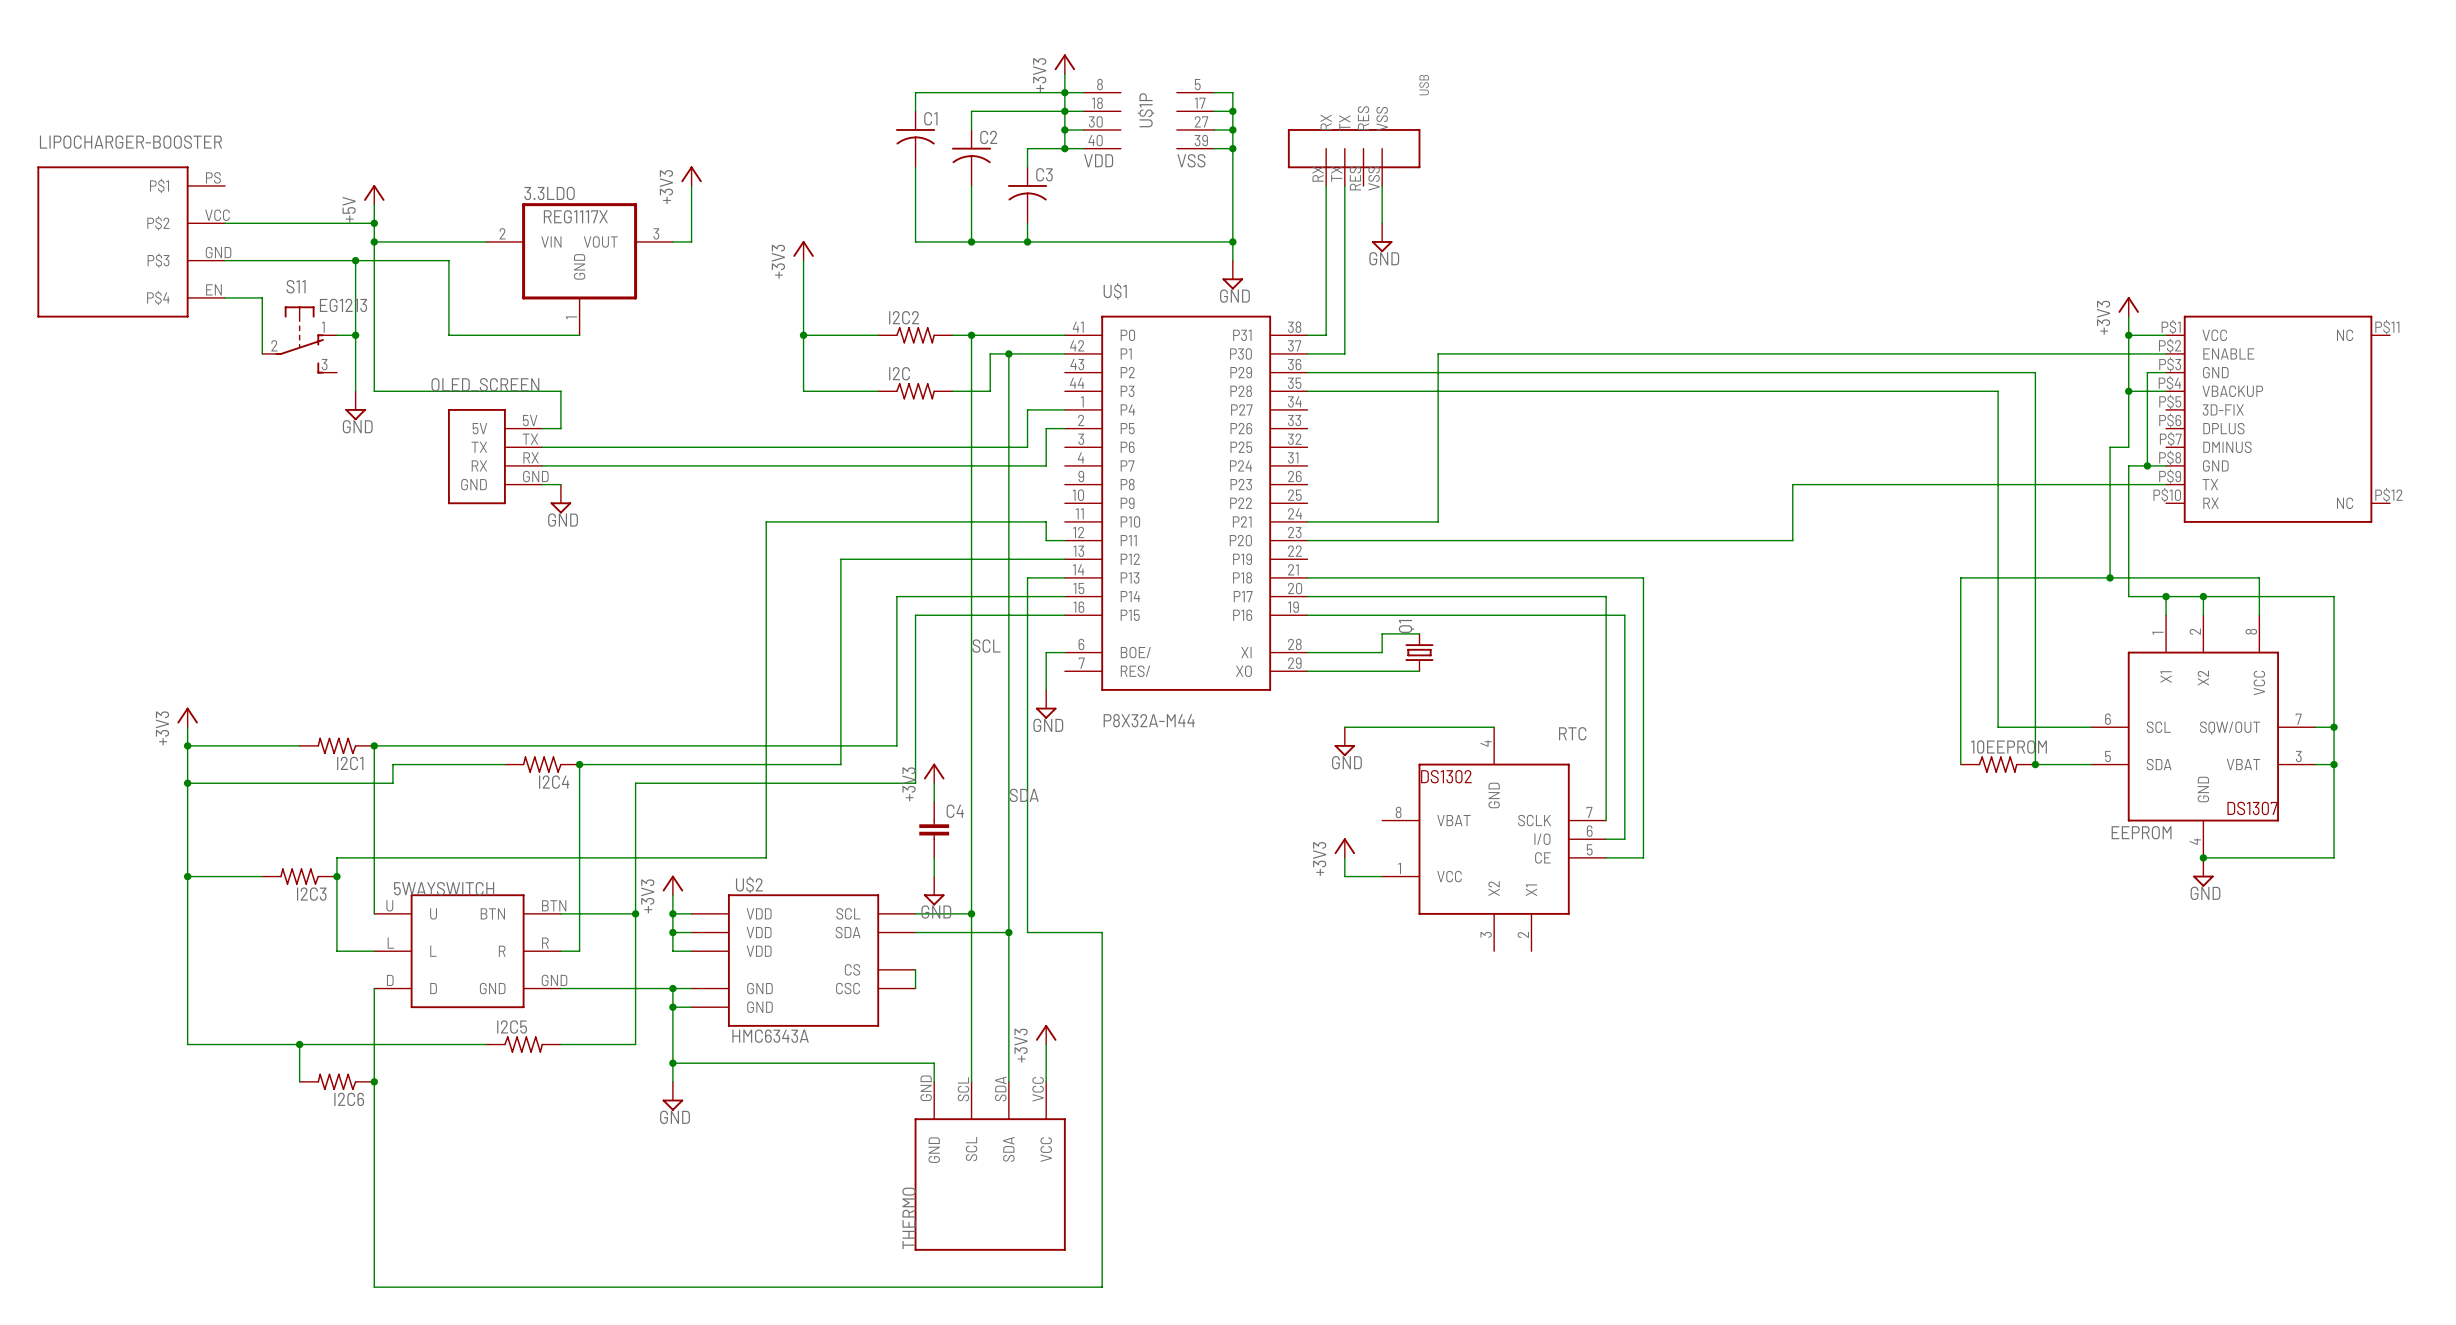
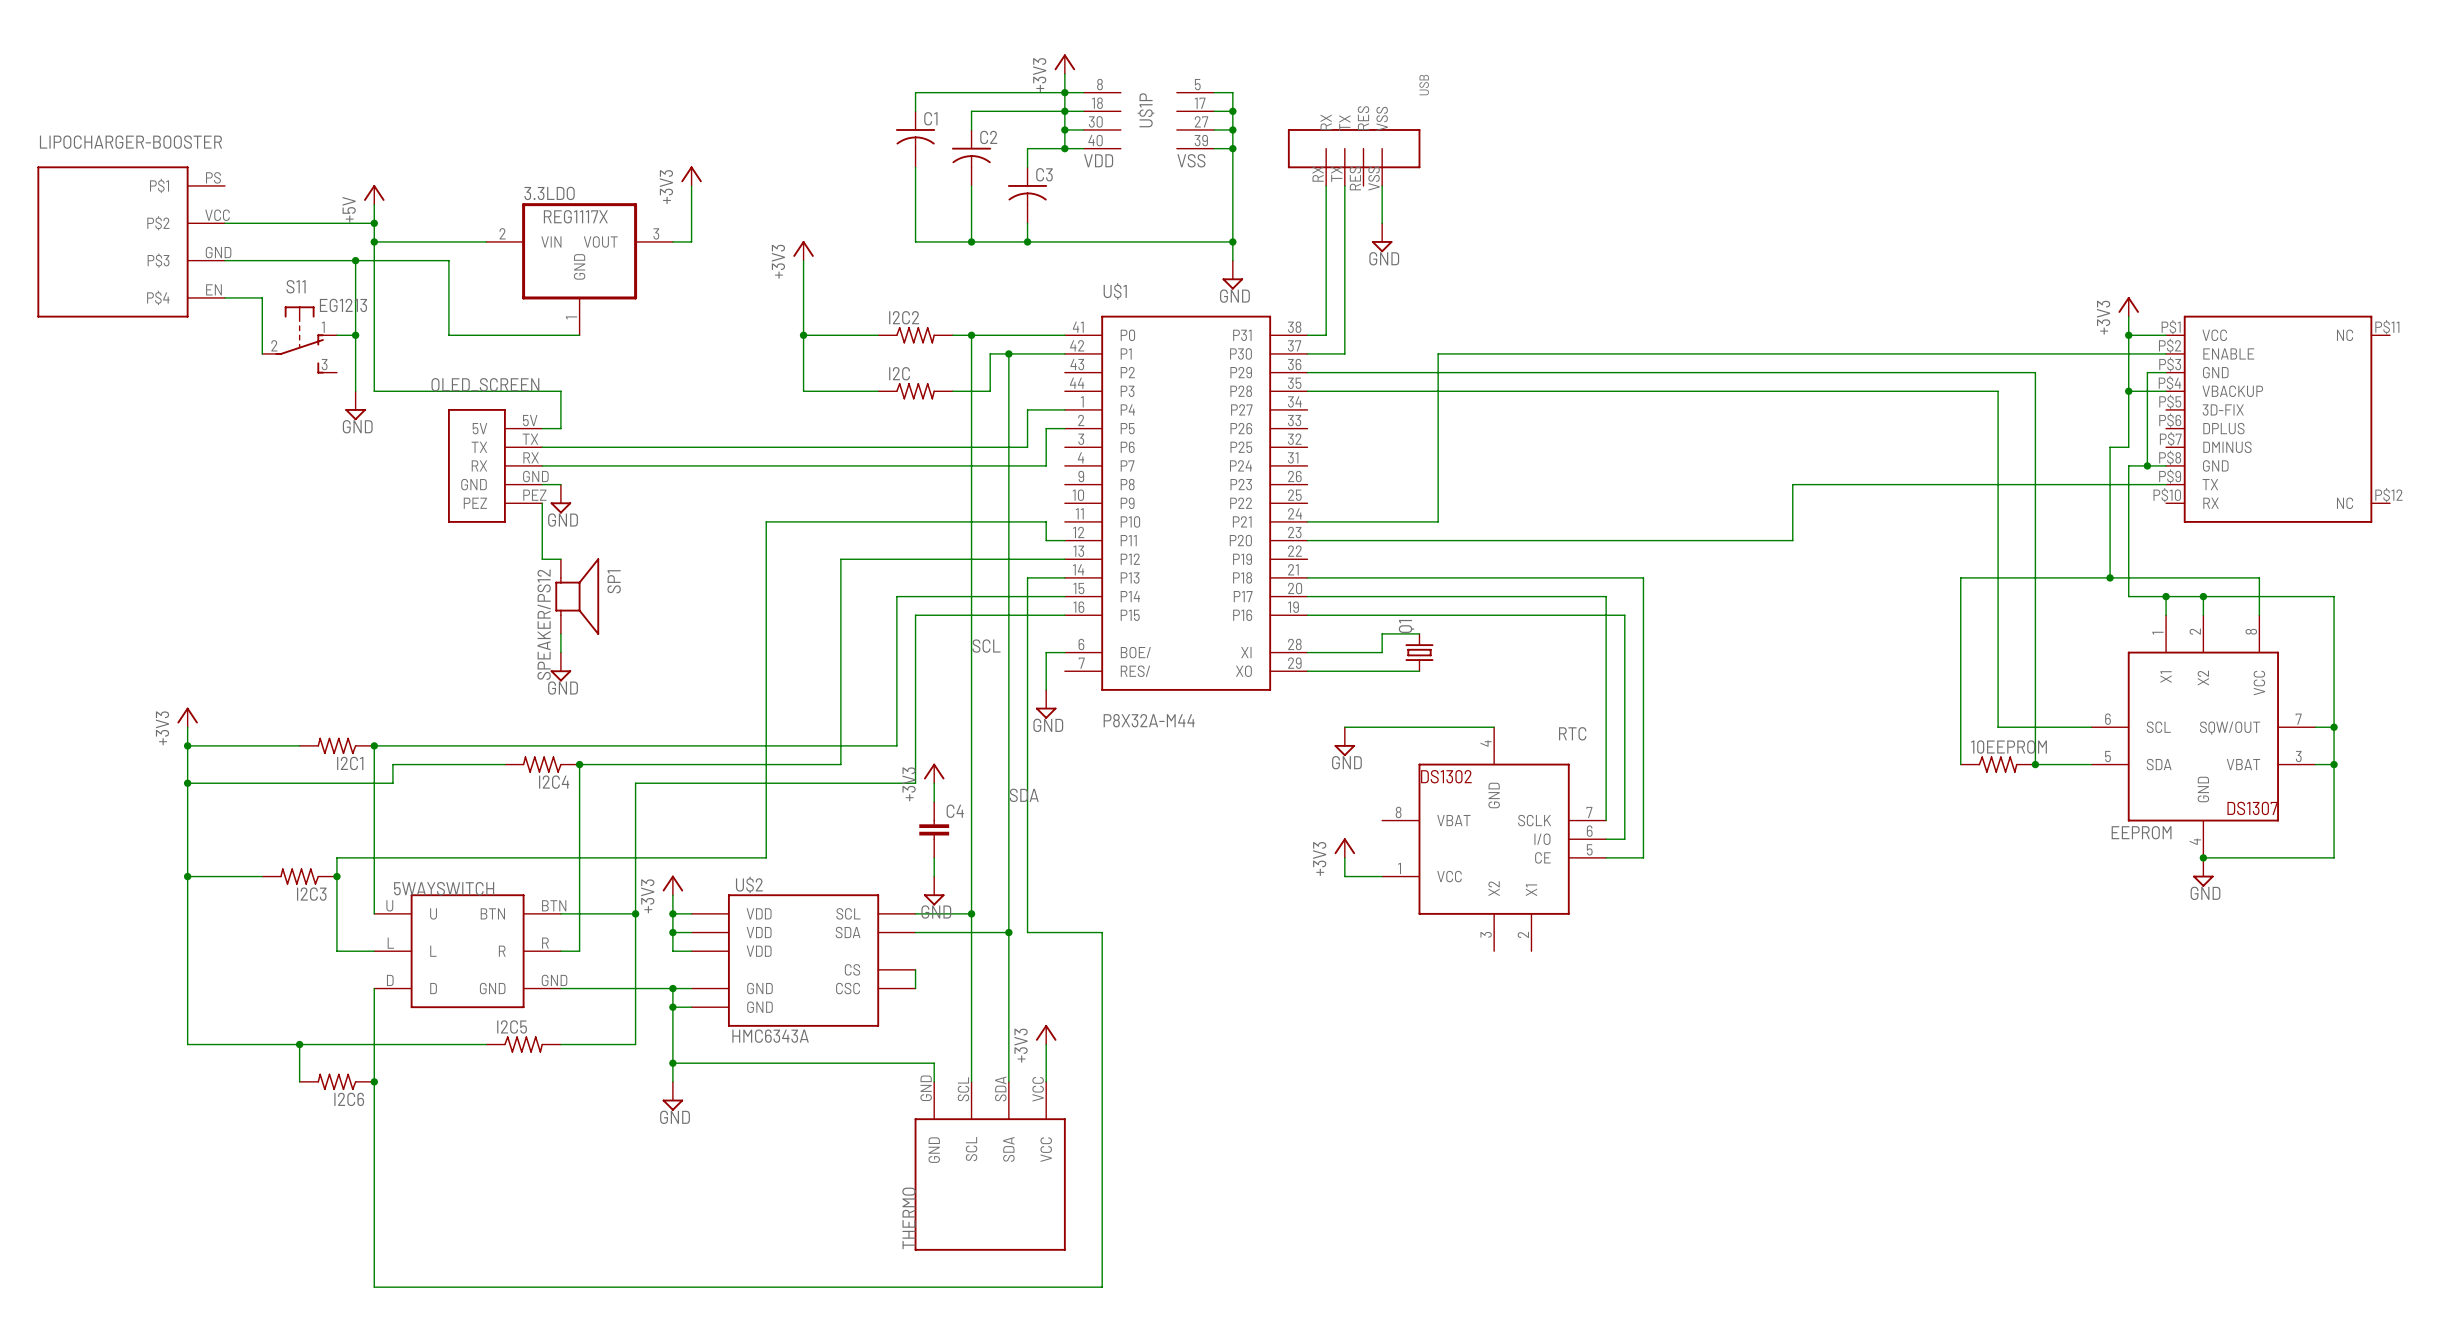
OLED_SCREEN: (495, 456) -> none
OLED_SCREEN: none -> (495, 465)
wire: none -> (542, 503) (542, 559) (560, 559)
SP1: none -> SPEAKER/PS12 (577, 596)
wire: none -> (560, 633) (560, 652)
power symbol: none -> GND (560, 667)

